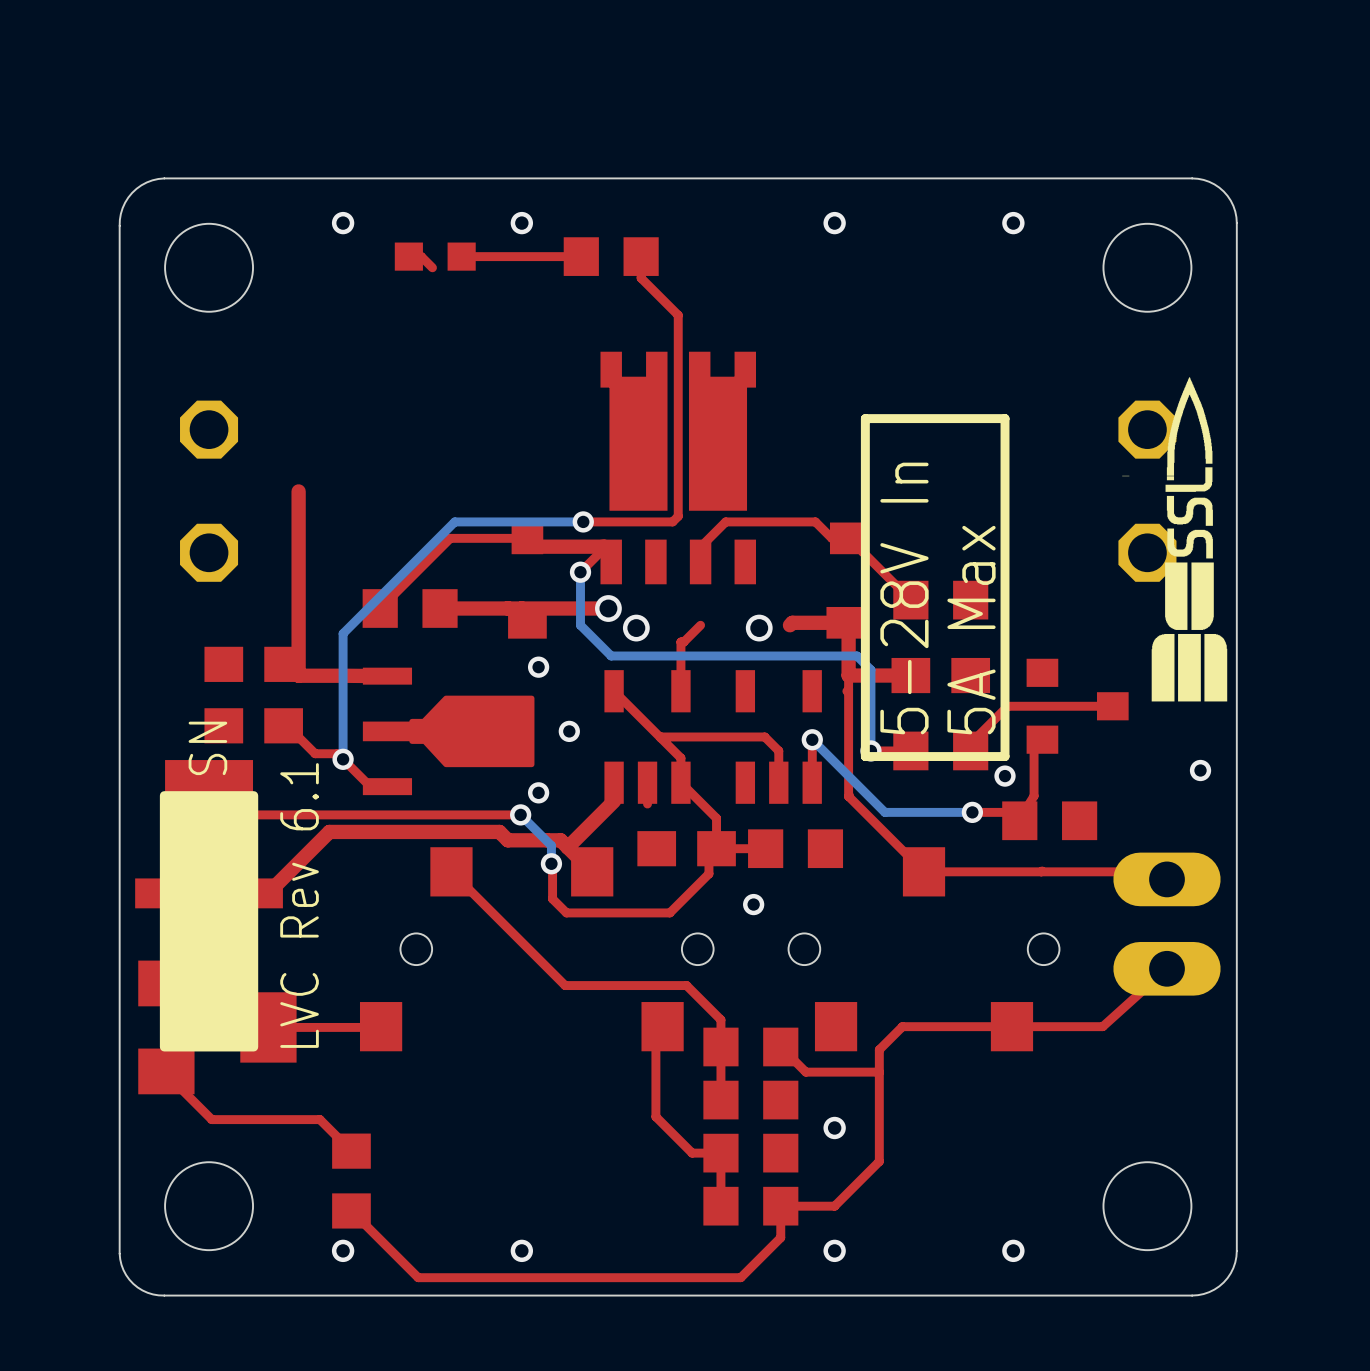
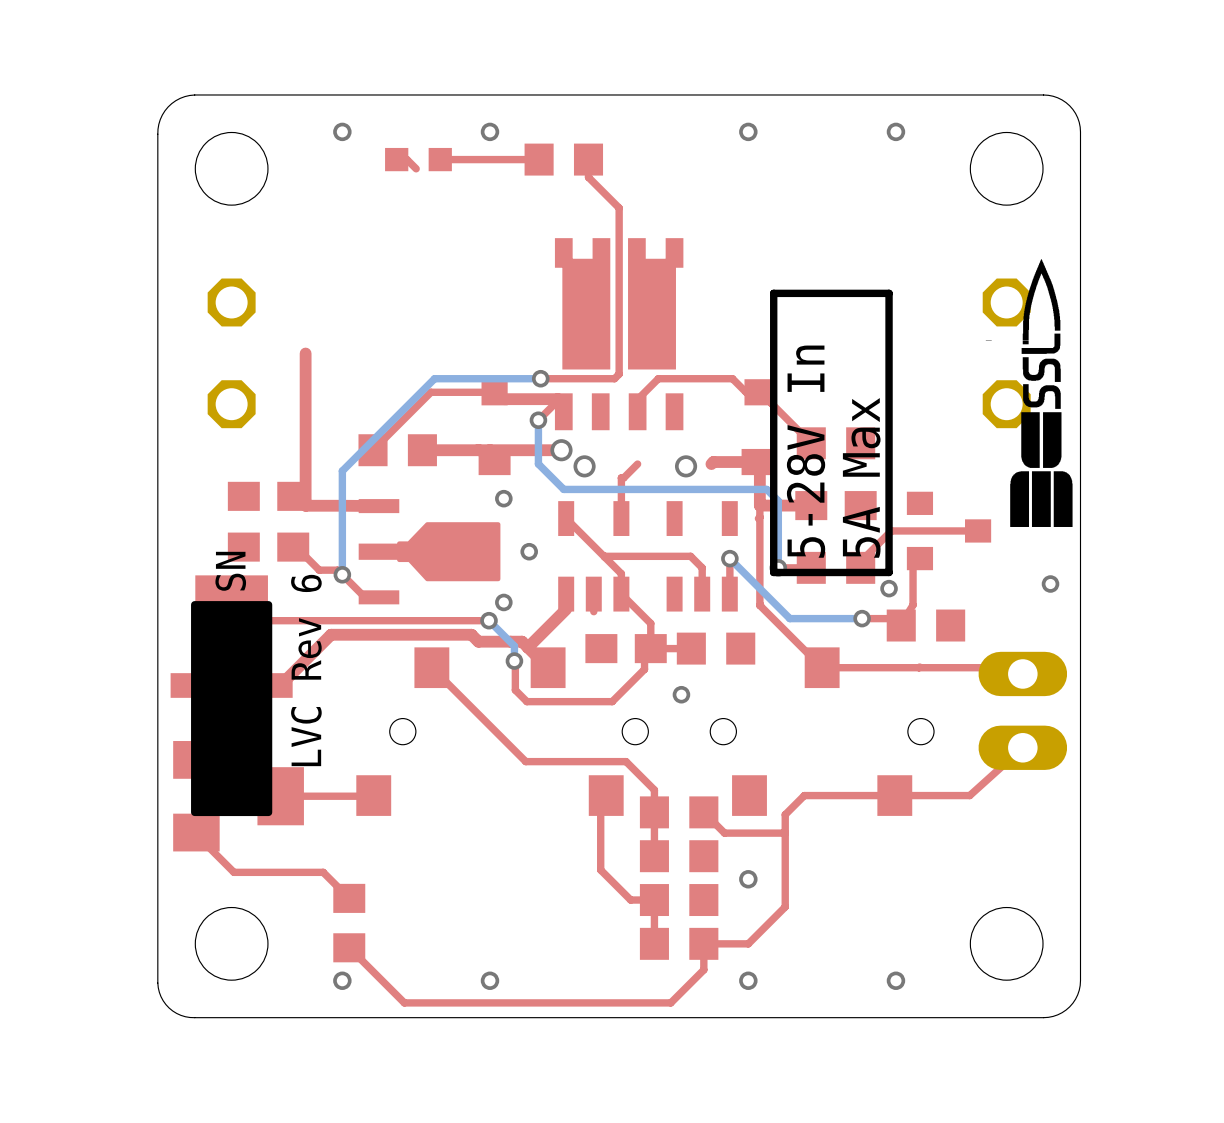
text: LVC Rev 6.1 (299, 905) -> LVC Rev 6 (306, 670)

